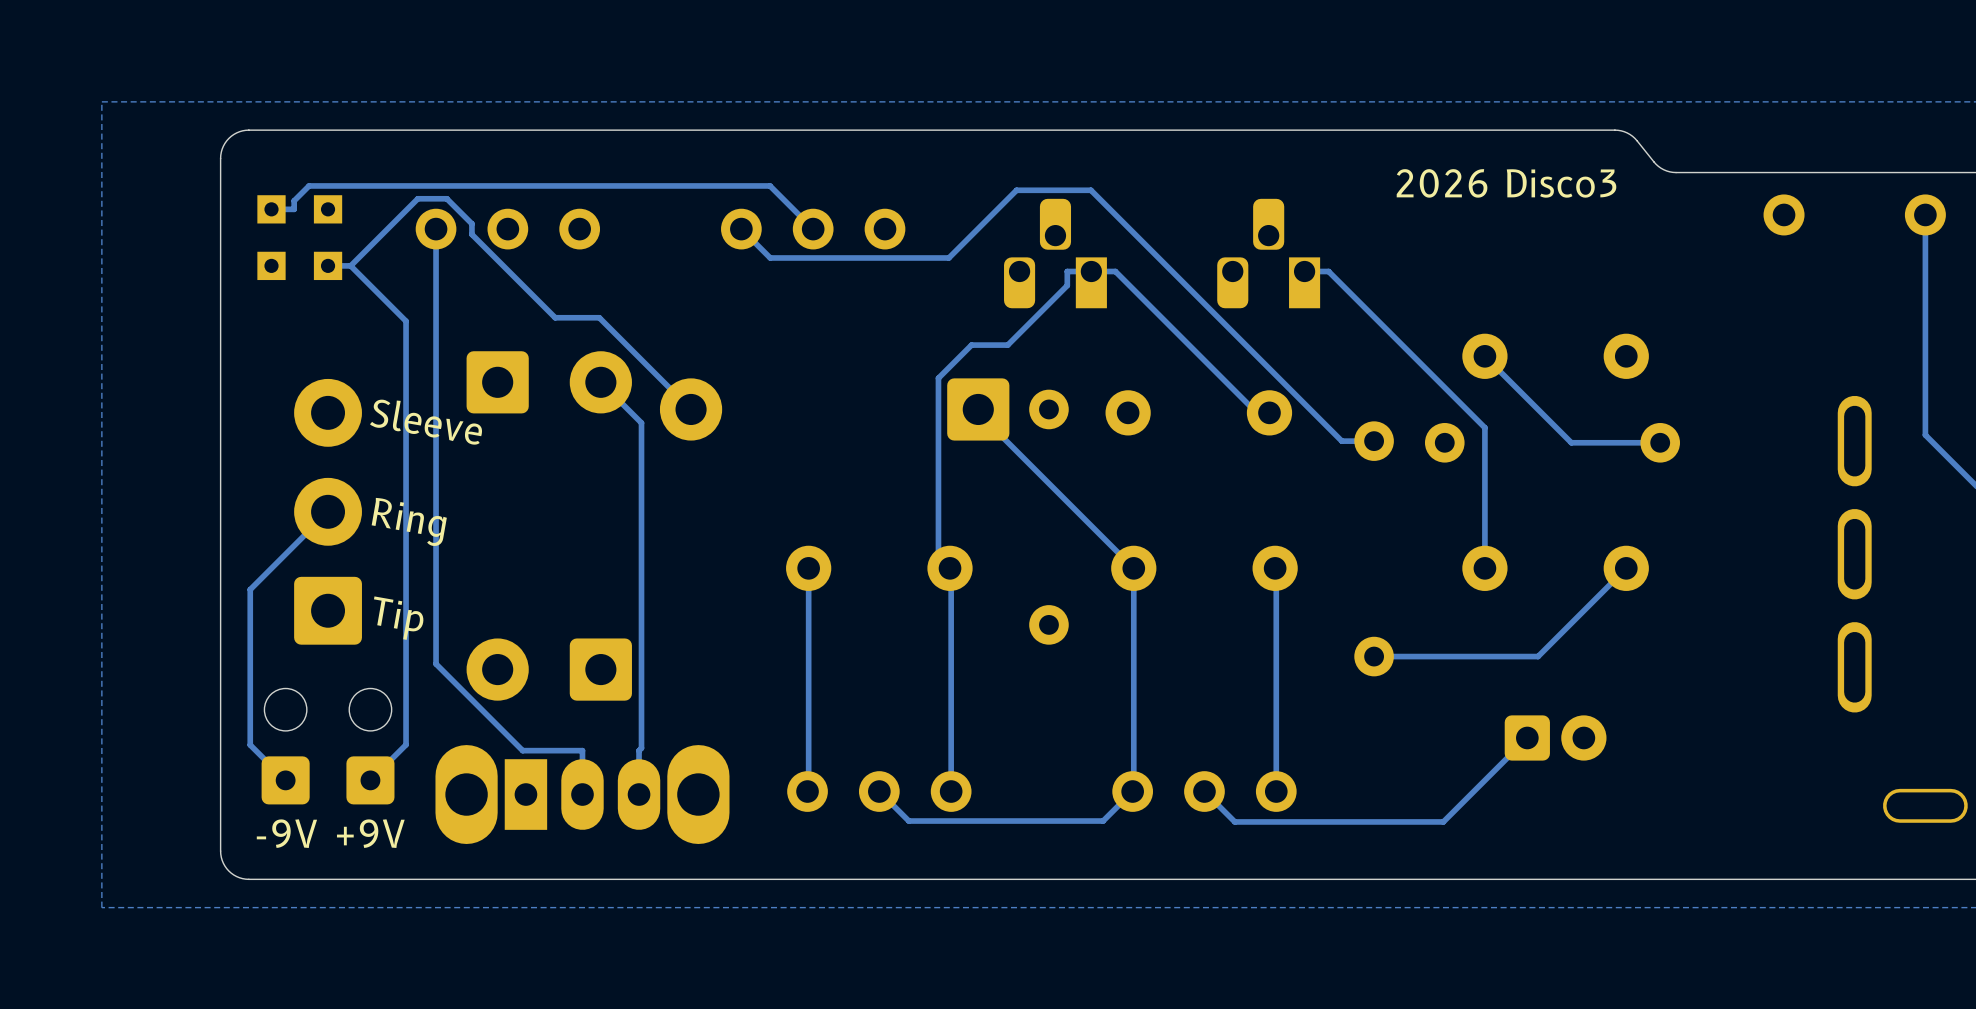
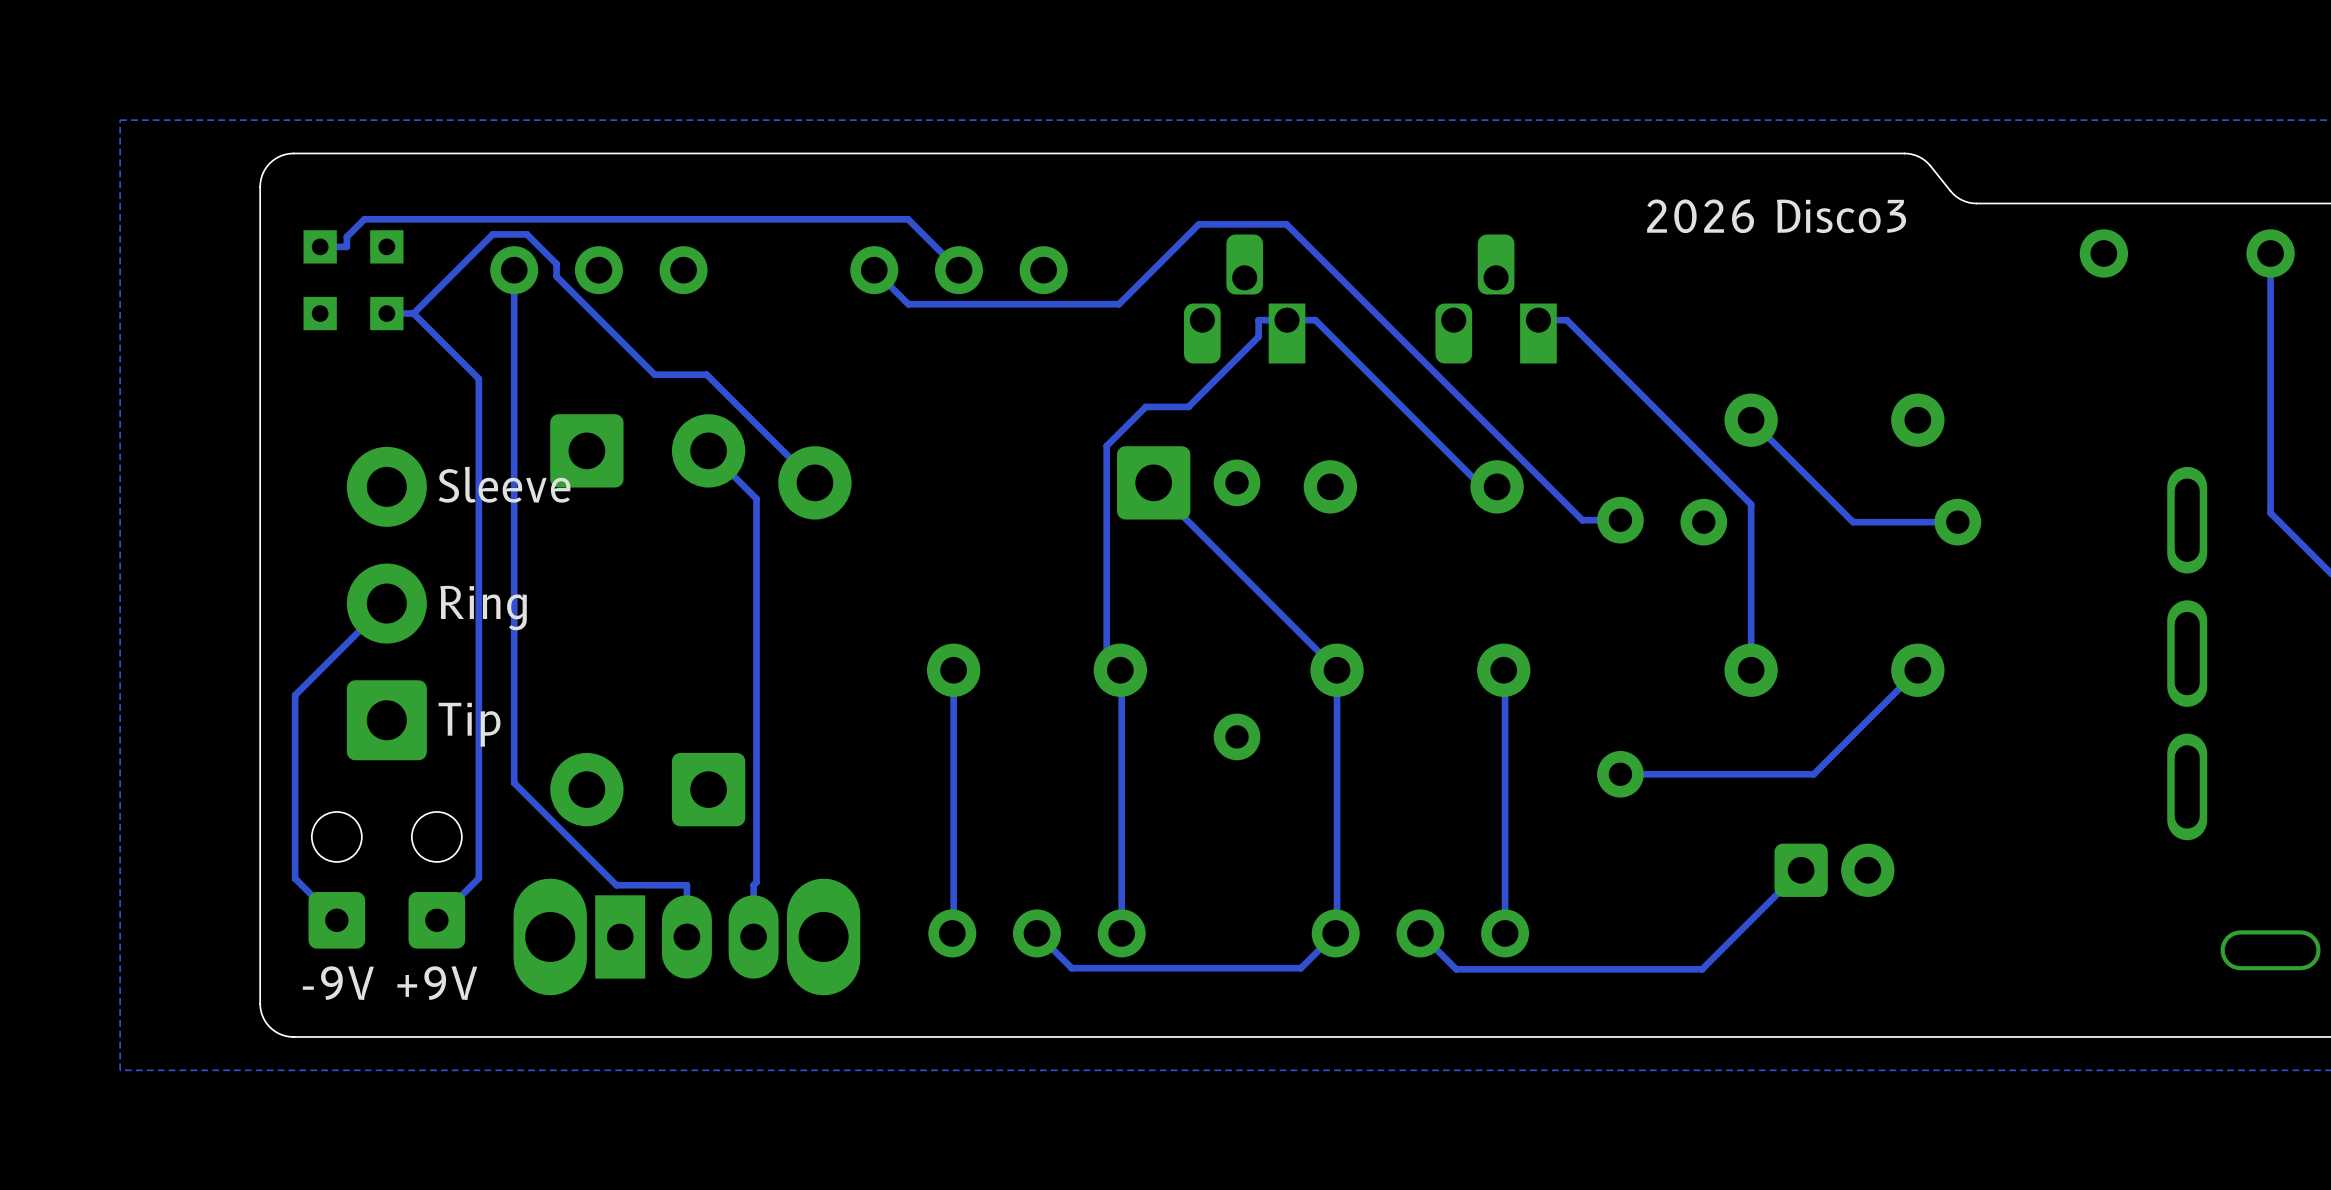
text rotation: 0° (426, 422) -> 10° counterclockwise (504, 484)
text rotation: 0° (409, 522) -> 10° counterclockwise (483, 608)
text rotation: 0° (398, 618) -> 10° counterclockwise (469, 724)

